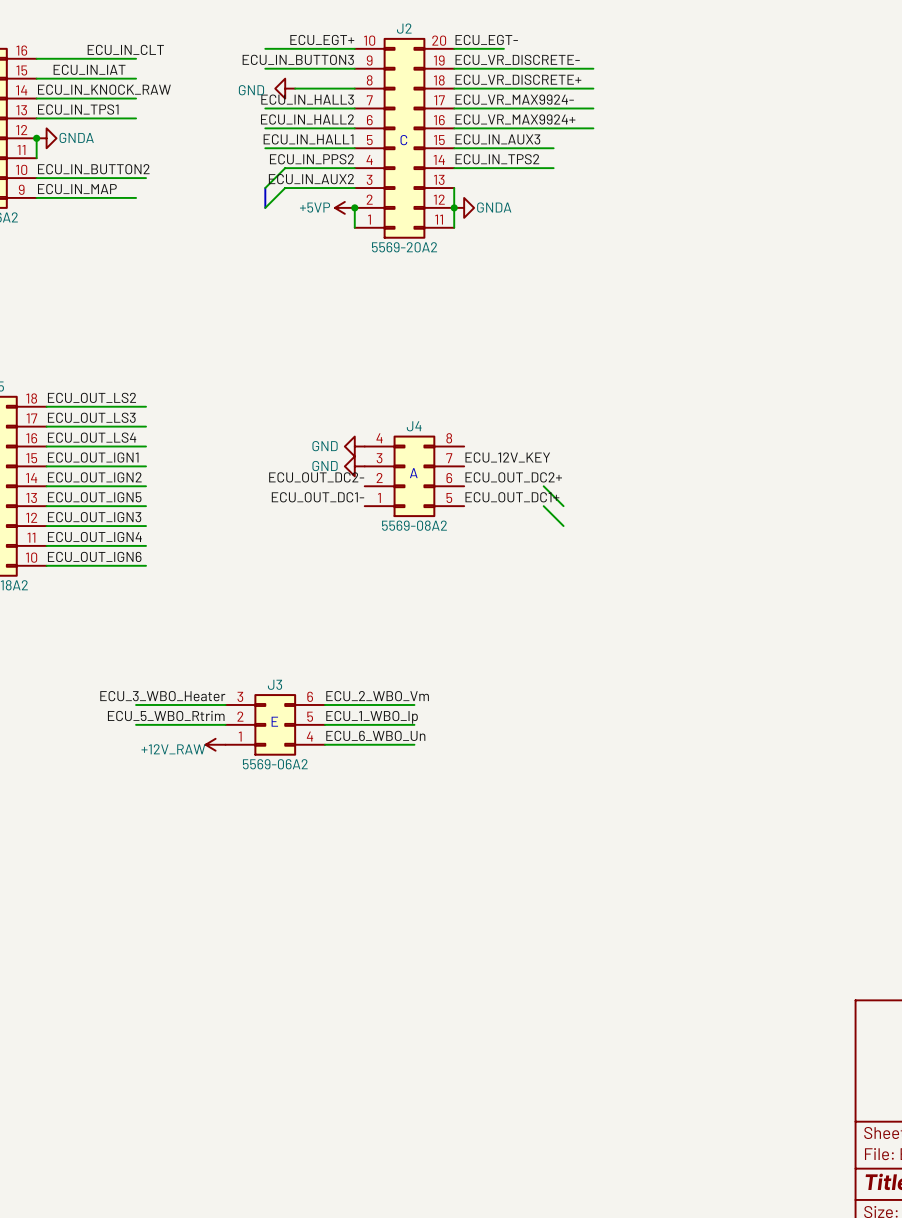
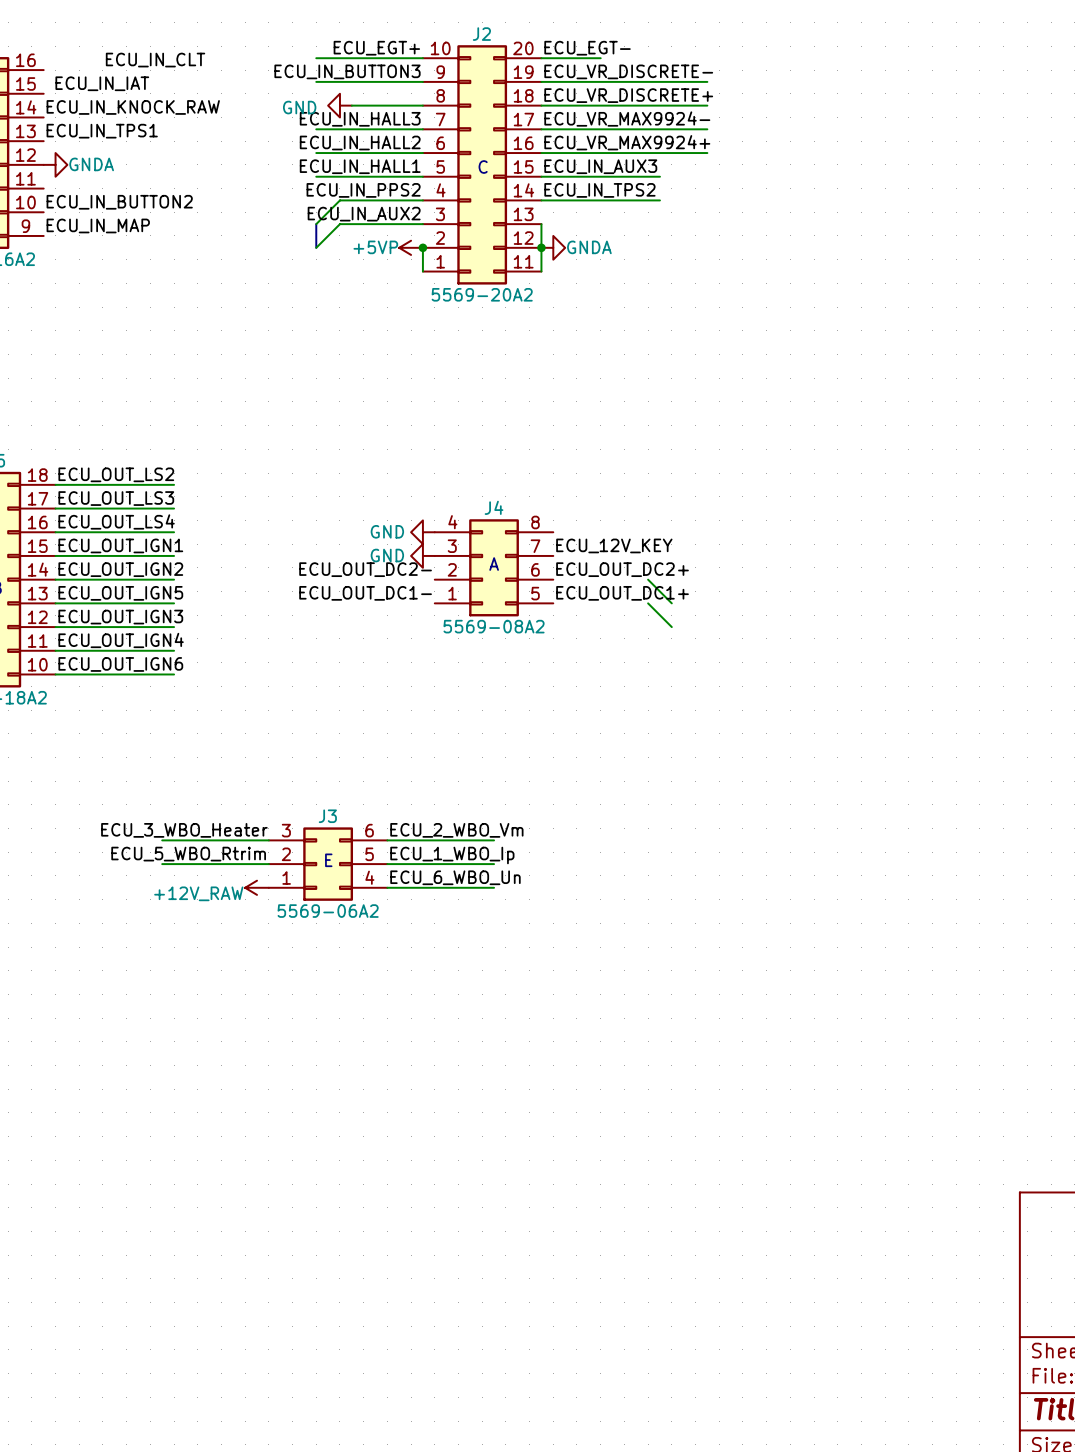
wire: (36, 58) (136, 58) -> none
wire: (36, 78) (136, 78) -> none
wire: (36, 98) (136, 98) -> none
wire: (36, 118) (136, 118) -> none
wire: (36, 138) (36, 158) -> none
junction: (36, 138) -> none
wire: (36, 178) (146, 178) -> none
wire: (36, 197) (136, 197) -> none

